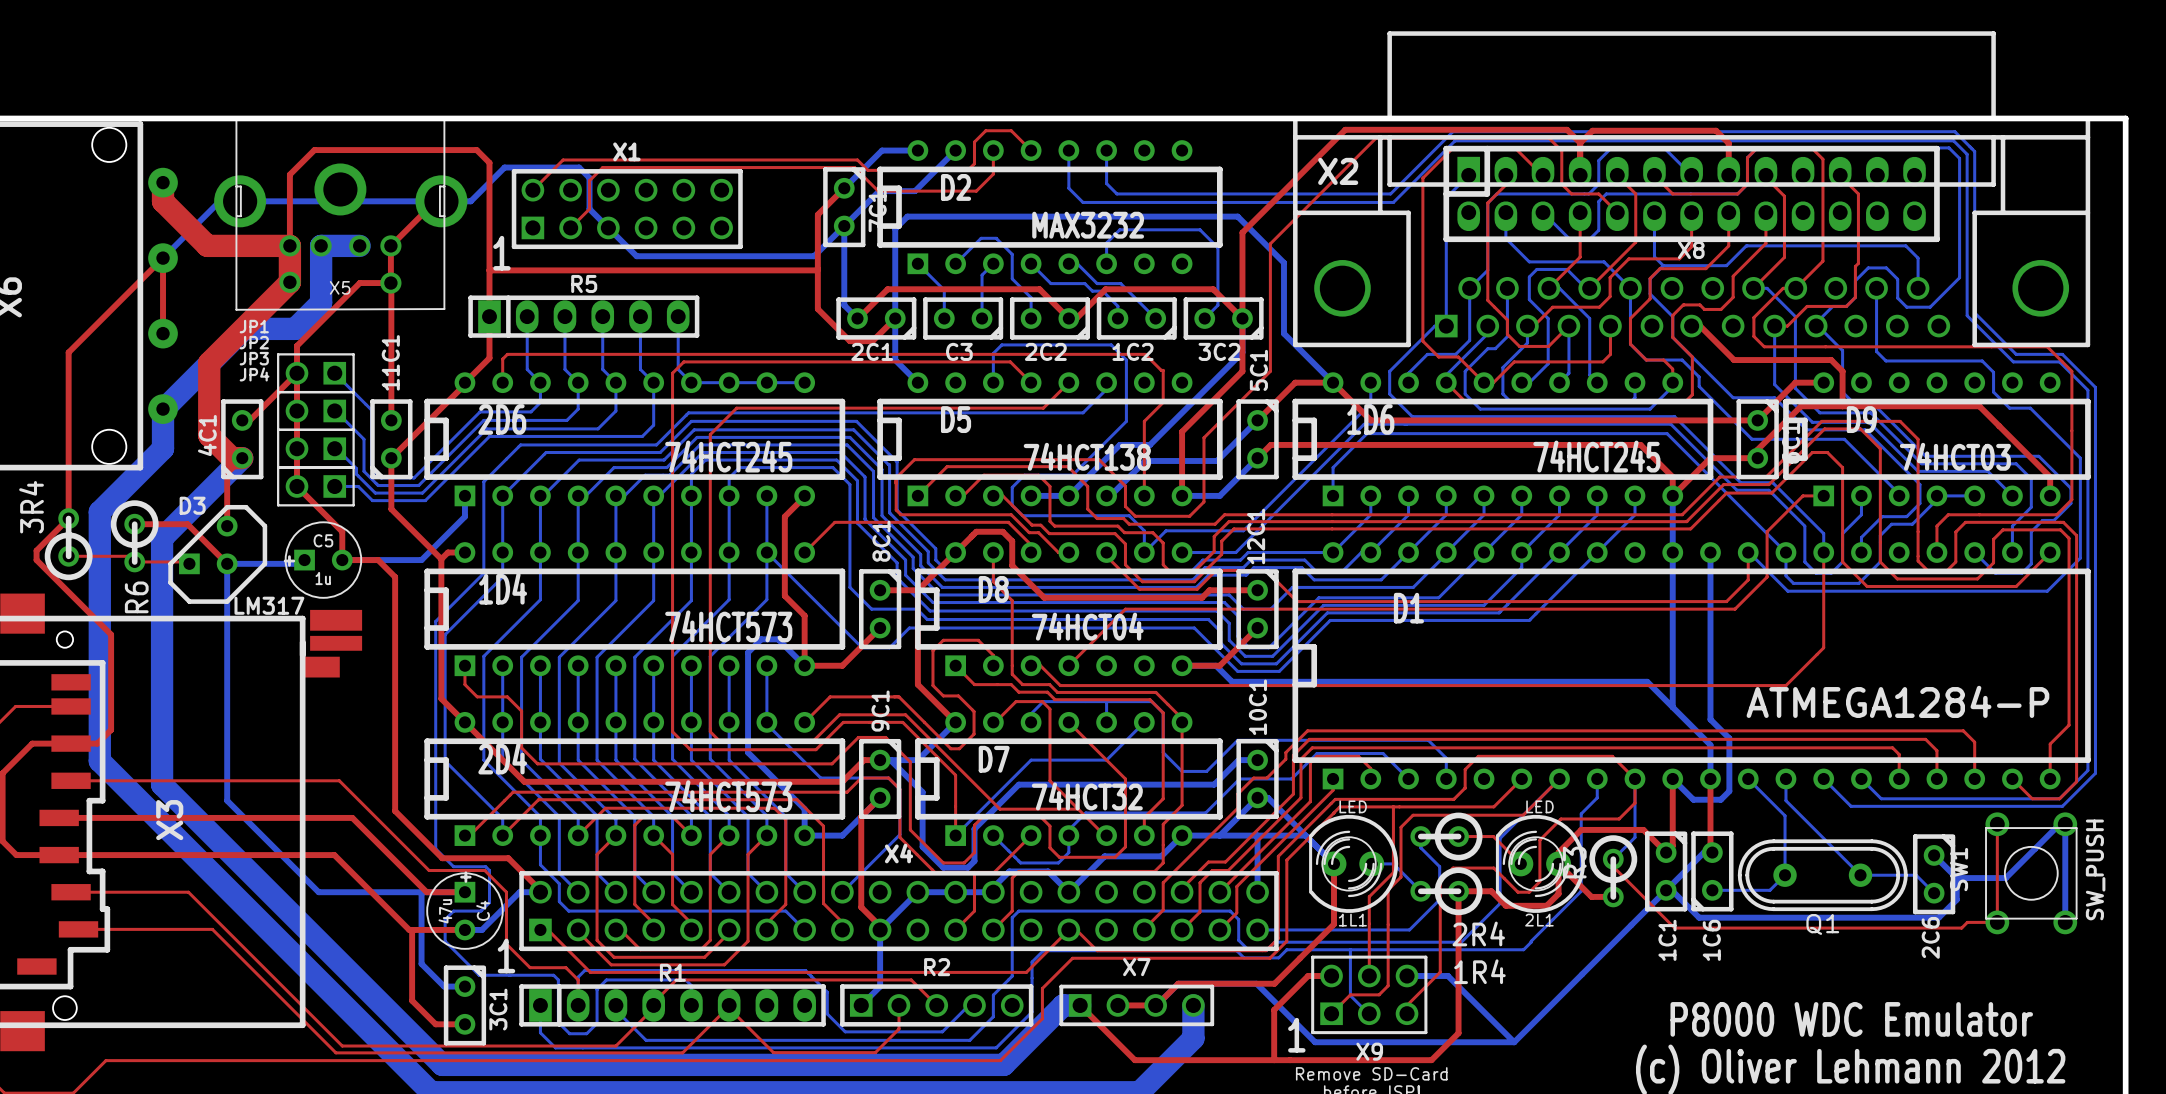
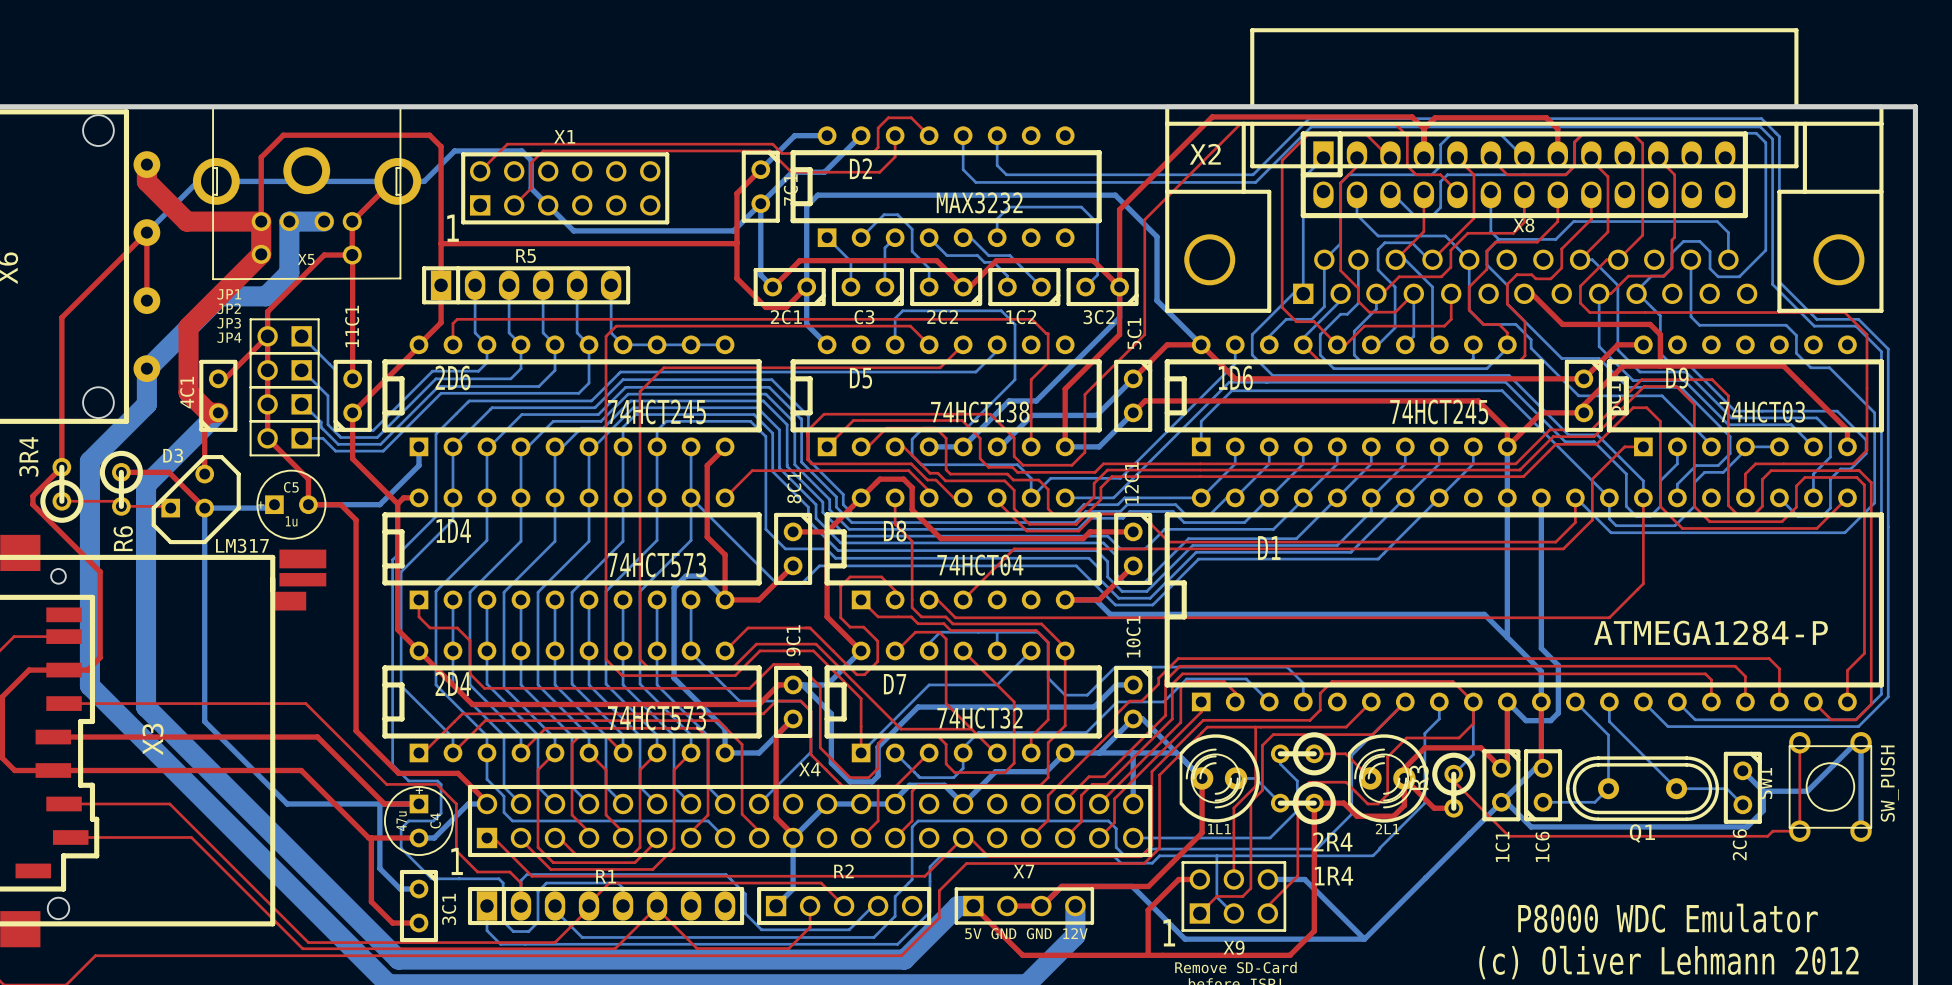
1L1 value: LED (1353, 806) -> none
2L1 value: LED (1539, 806) -> none
text: none -> 5V GND GND 12V (1026, 933)

